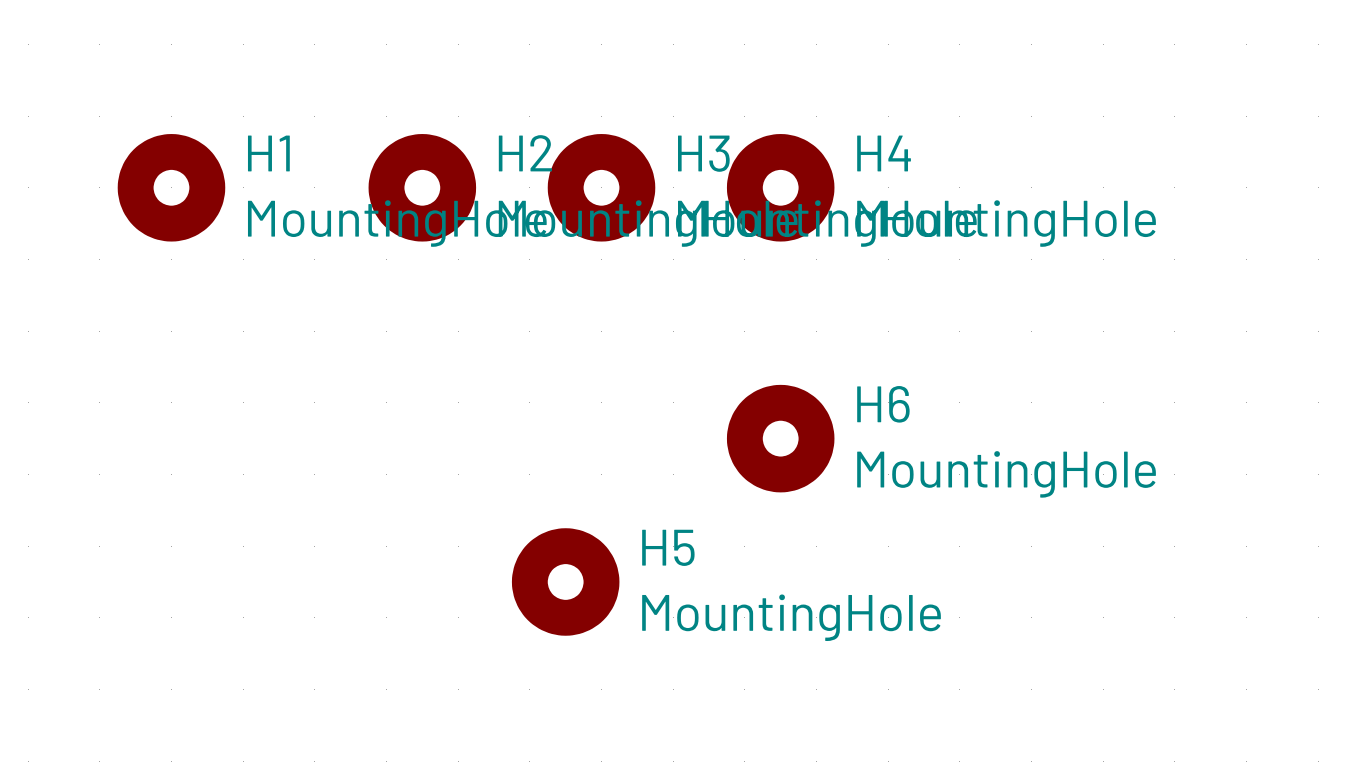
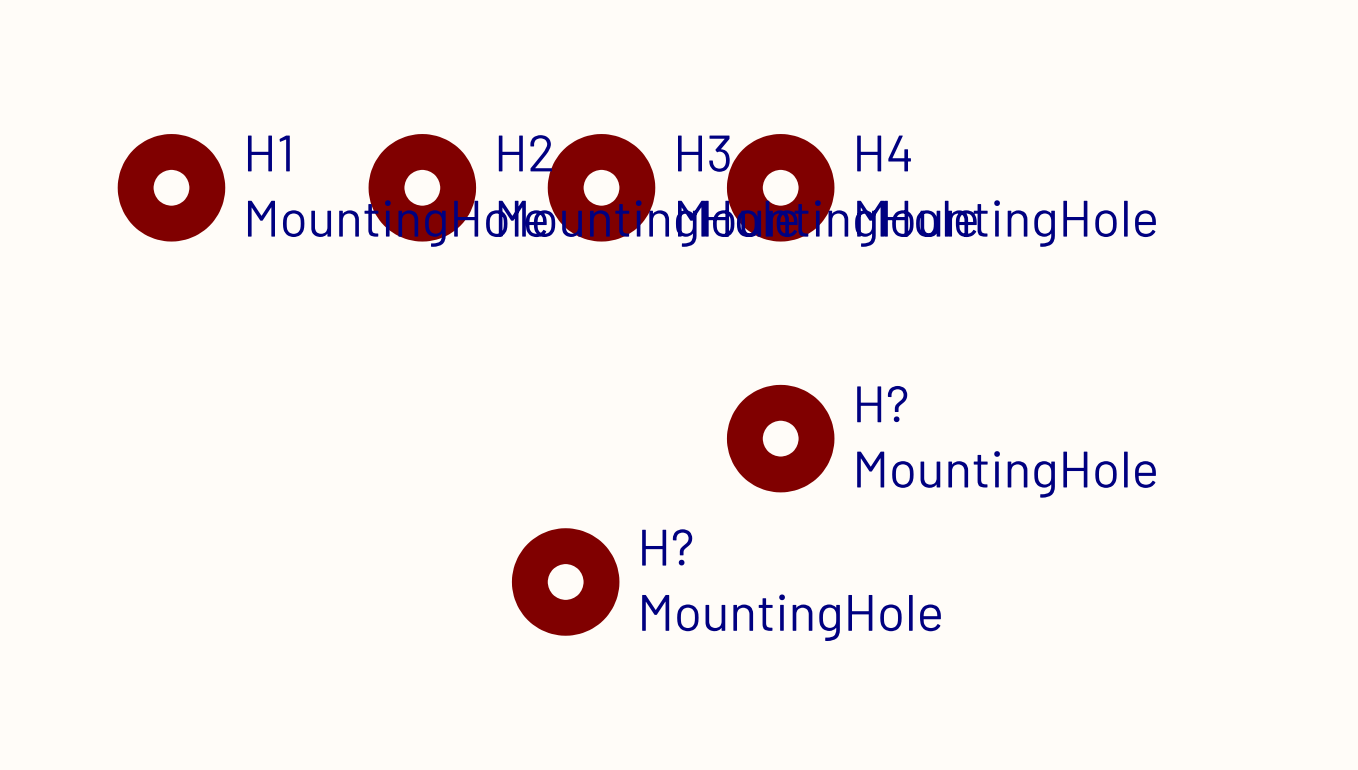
H6 name: H6 (883, 404) -> H? (882, 404)
H5 name: H5 (668, 547) -> H? (667, 547)

